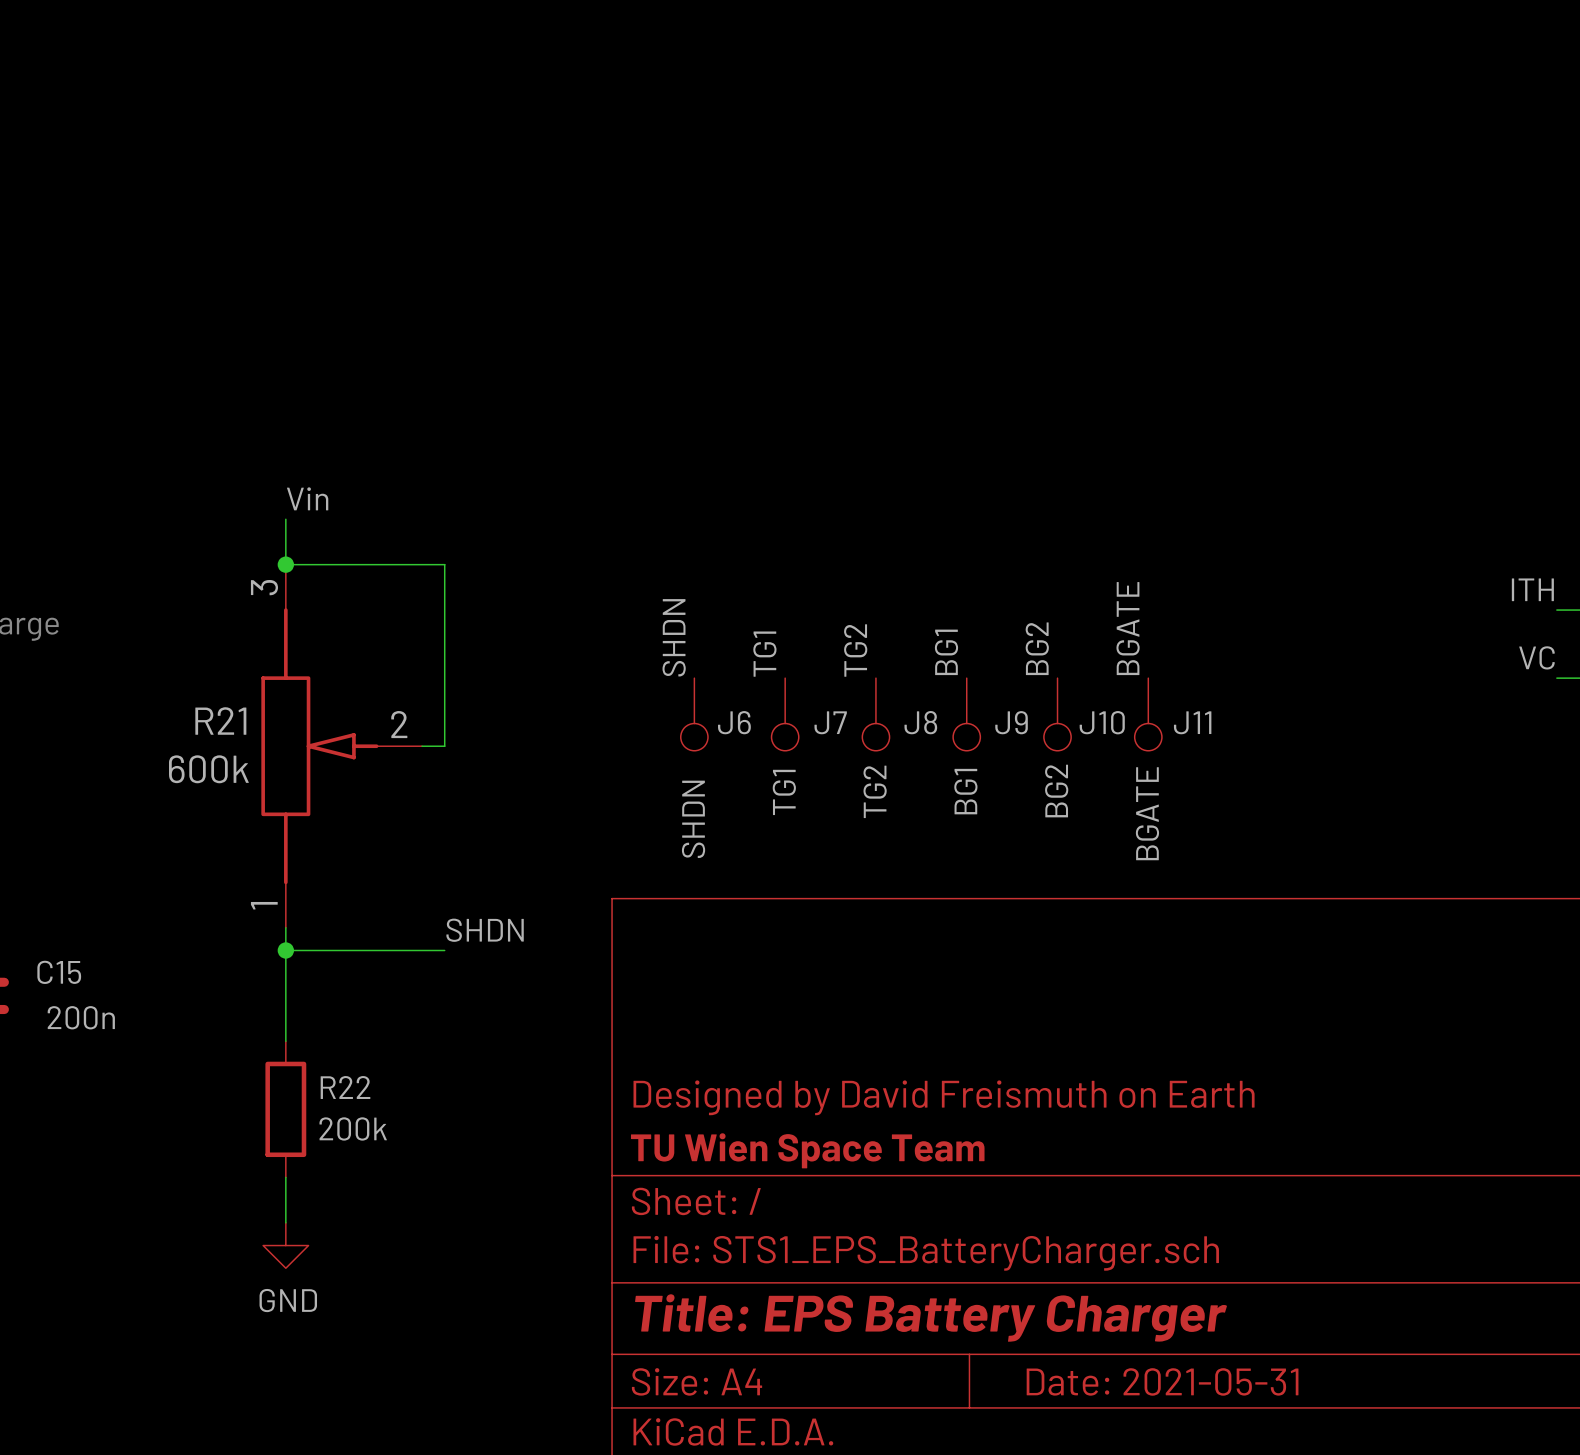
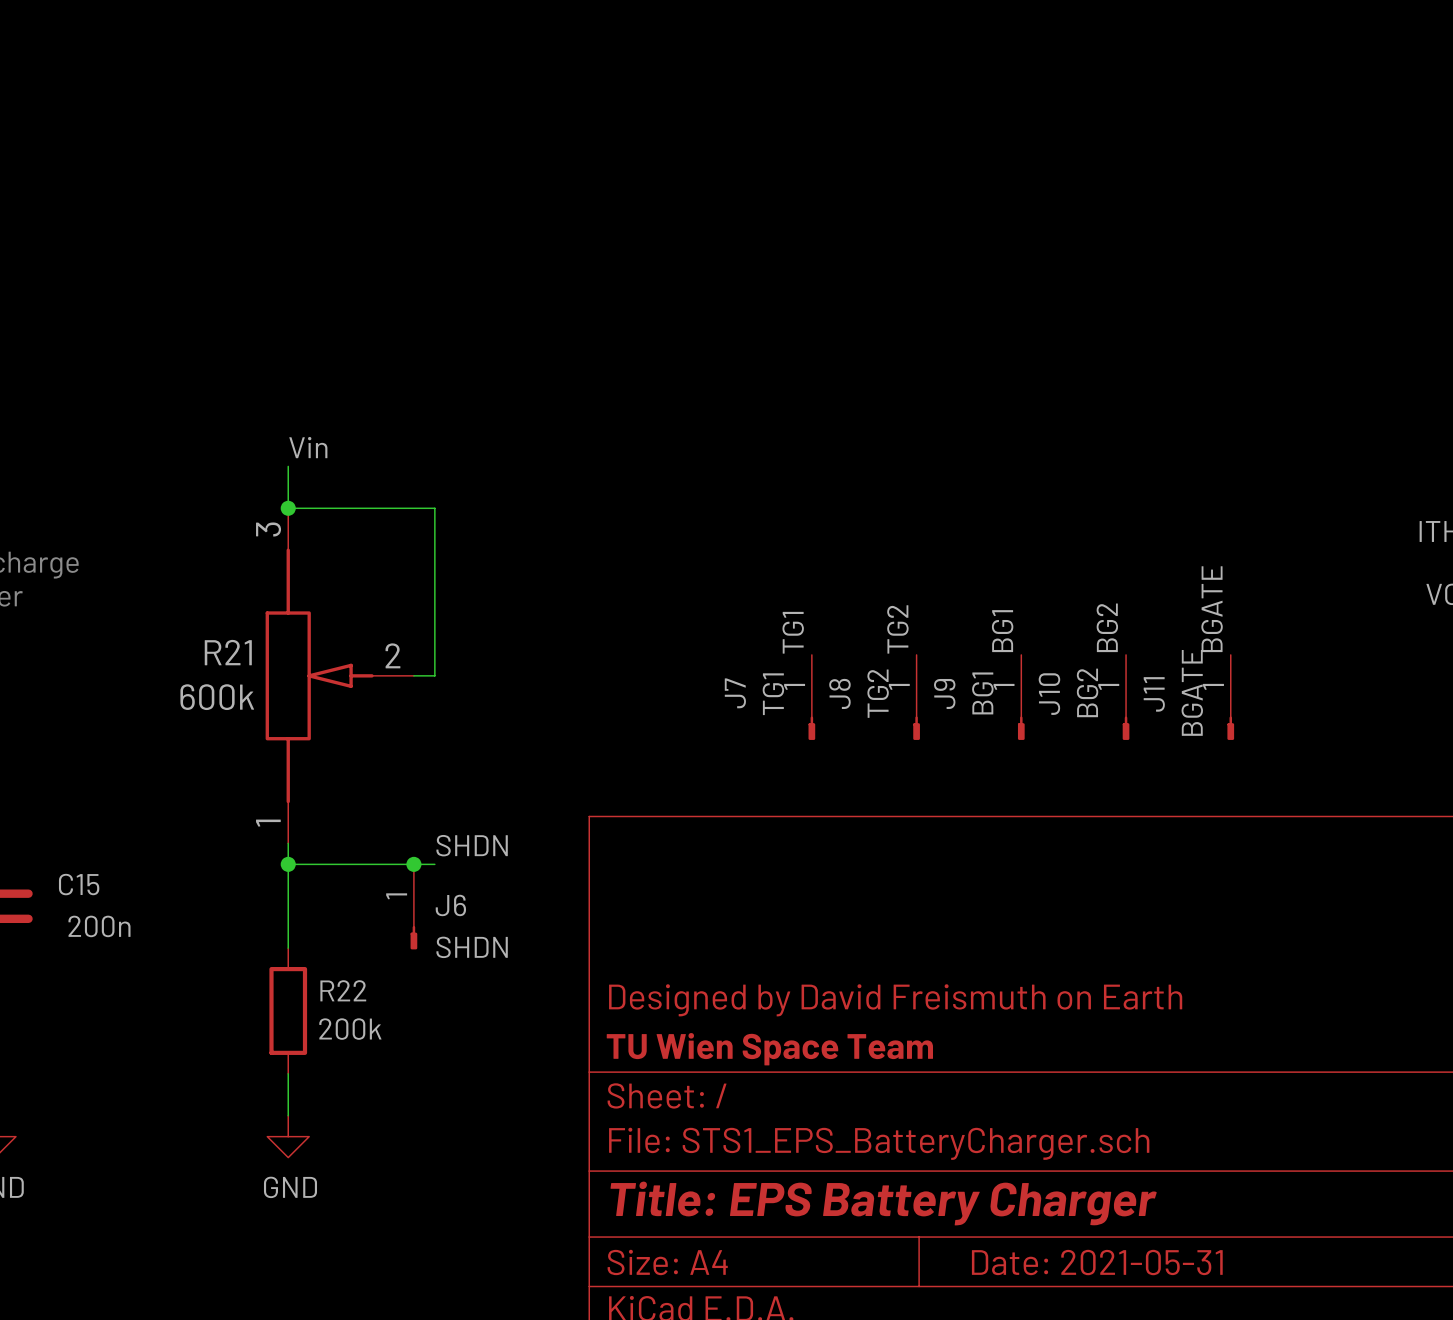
label position: BGATE (1128, 628) -> BGATE (1212, 609)
label: SHDN (674, 637) -> none
label position: BG2 (1037, 648) -> BG2 (1107, 627)
label position: TG2 (855, 650) -> TG2 (897, 629)
label position: BG1 (946, 652) -> BG1 (1002, 631)
label position: TG1 (764, 654) -> TG1 (793, 632)
J6 symbol: [680, 678, 708, 751] -> [410, 864, 418, 950]
J7 symbol: [771, 678, 799, 751] -> [808, 654, 816, 740]
J8 symbol: [862, 678, 890, 751] -> [913, 654, 920, 740]
J9 symbol: [953, 678, 981, 751] -> [1017, 654, 1025, 740]
J10 symbol: [1043, 678, 1072, 751] -> [1122, 654, 1130, 740]
J11 symbol: [1134, 678, 1162, 751] -> [1227, 654, 1235, 740]
J7 name position: J7 (830, 722) -> J7 (735, 693)
J8 name position: J8 (920, 722) -> J8 (839, 693)
J9 name position: J9 (1011, 722) -> J9 (944, 693)
J10 name position: J10 (1102, 722) -> J10 (1049, 694)
J11 name position: J11 (1192, 722) -> J11 (1154, 694)
J8 value position: TG2 (875, 791) -> TG2 (878, 693)
J9 value position: BG1 (965, 791) -> BG1 (982, 693)
J10 value position: BG2 (1056, 791) -> BG2 (1087, 692)
J7 value position: TG1 (784, 792) -> TG1 (773, 694)
J11 value position: BGATE (1147, 813) -> BGATE (1192, 692)
J6 value position: SHDN (693, 819) -> SHDN (472, 947)
junction: none -> (413, 864)

